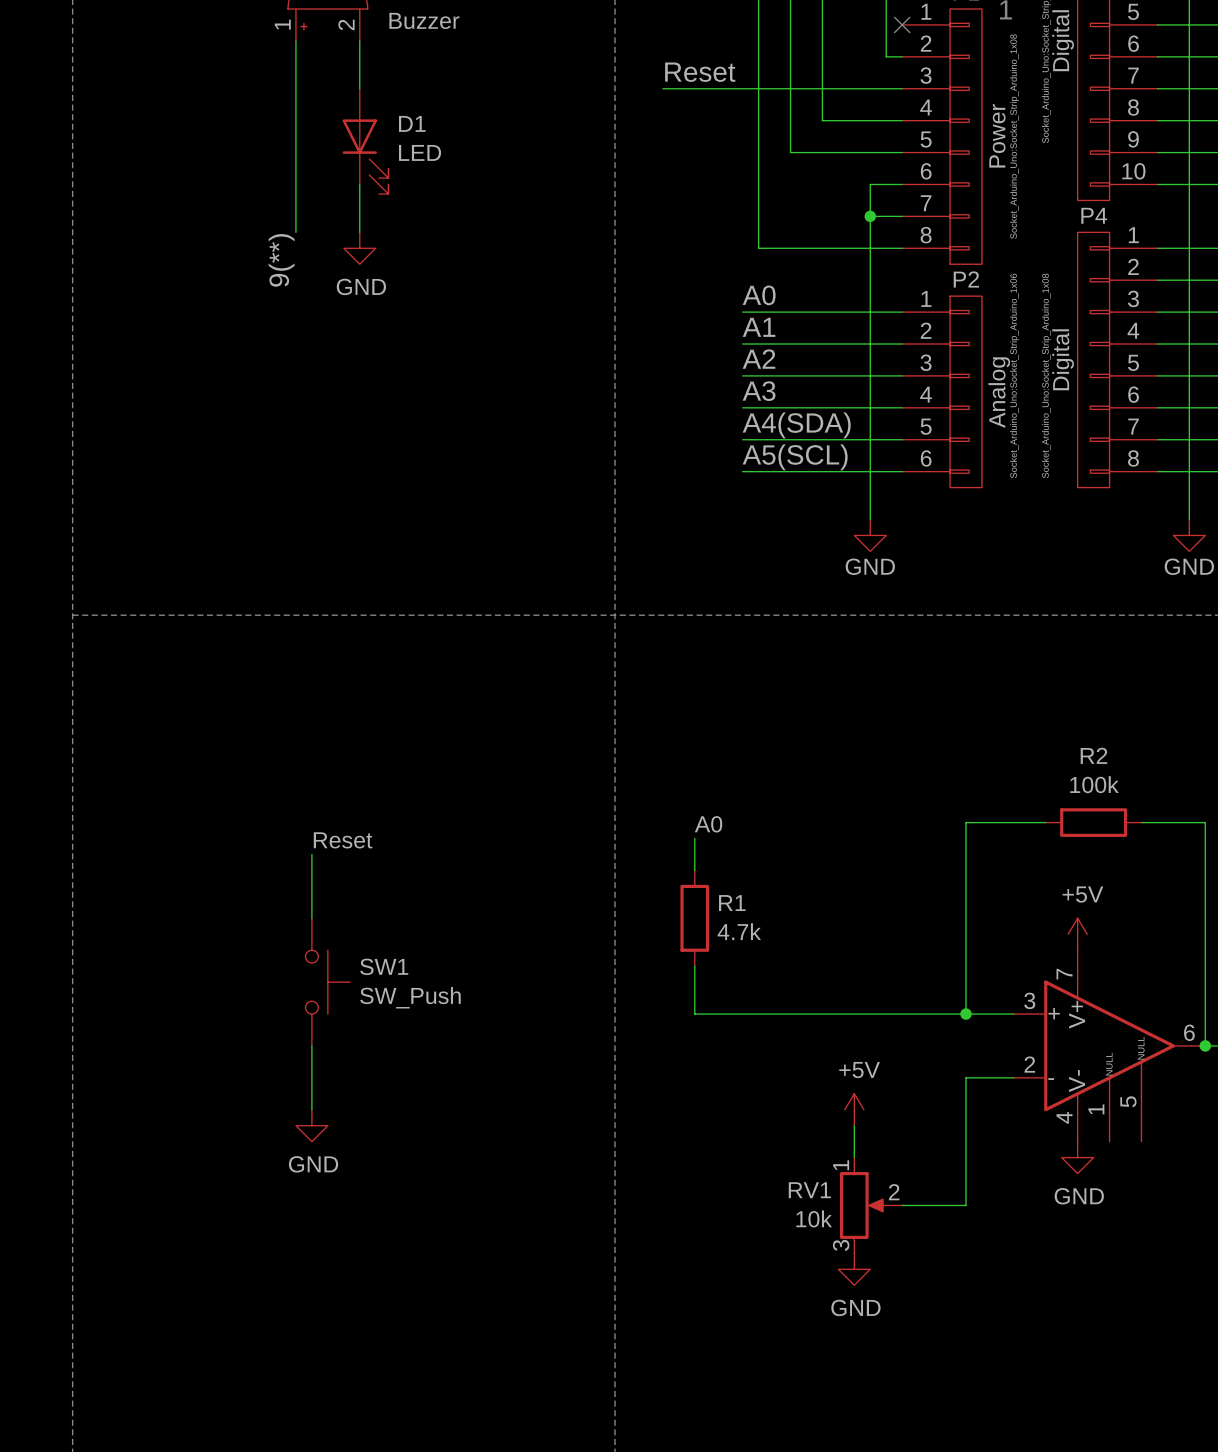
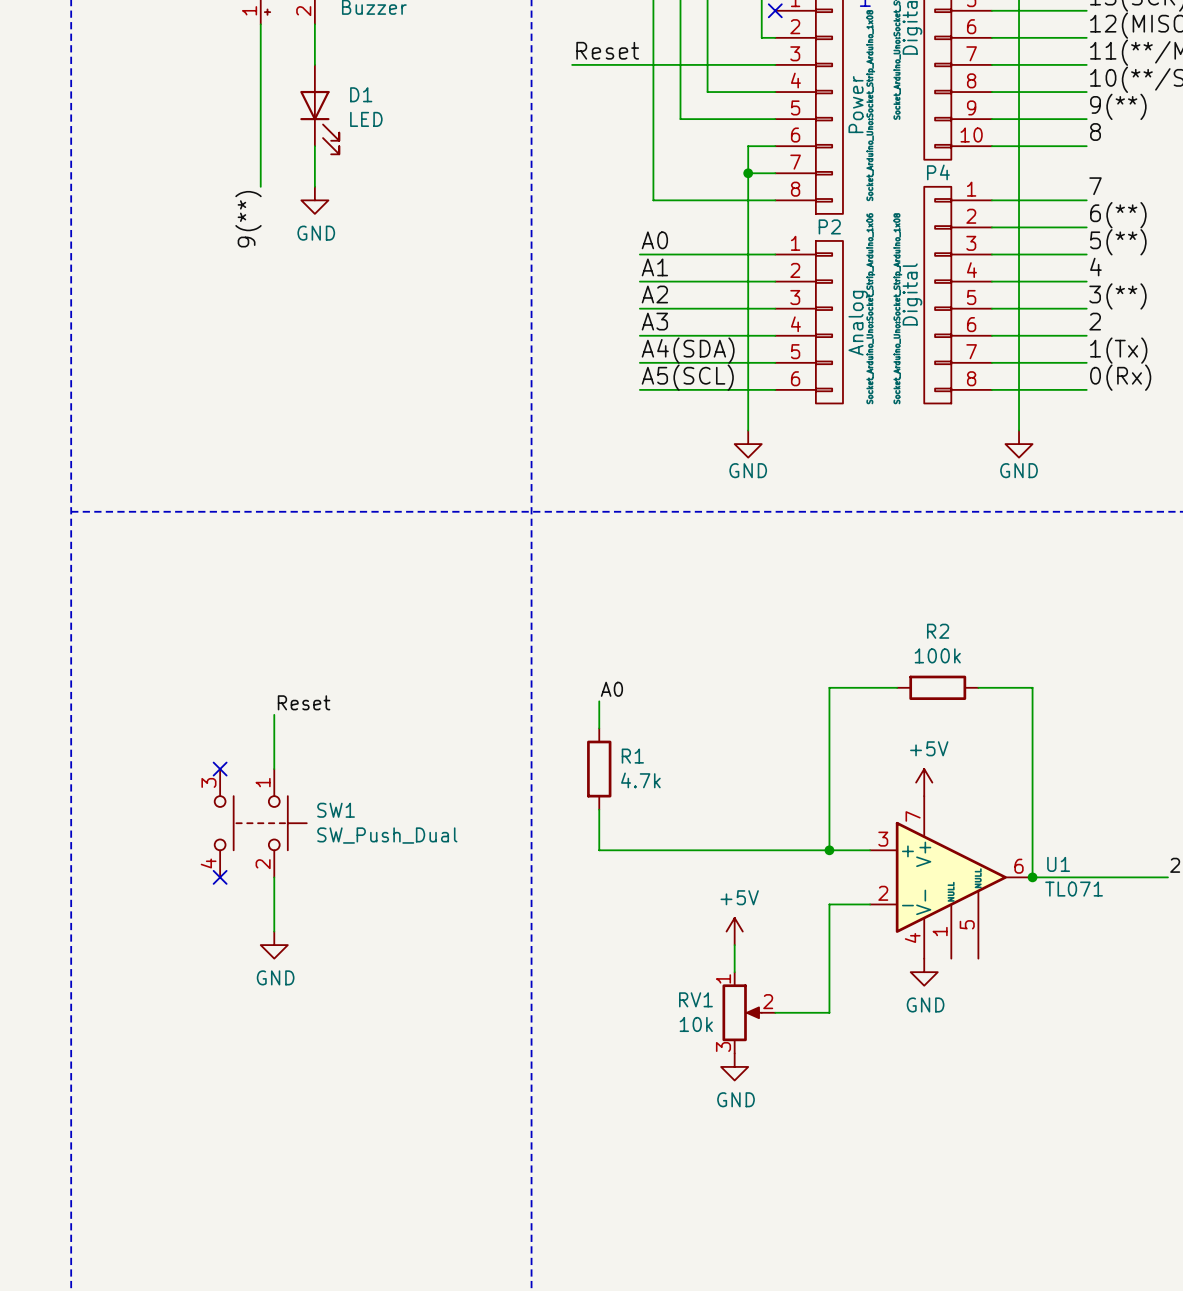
no-connect mark: none -> (220, 769)
SW1 symbol: [305, 918, 351, 1046] -> [214, 769, 307, 878]
SW1 value: SW_Push (410, 997) -> SW_Push_Dual (387, 835)
no-connect mark: none -> (220, 877)

